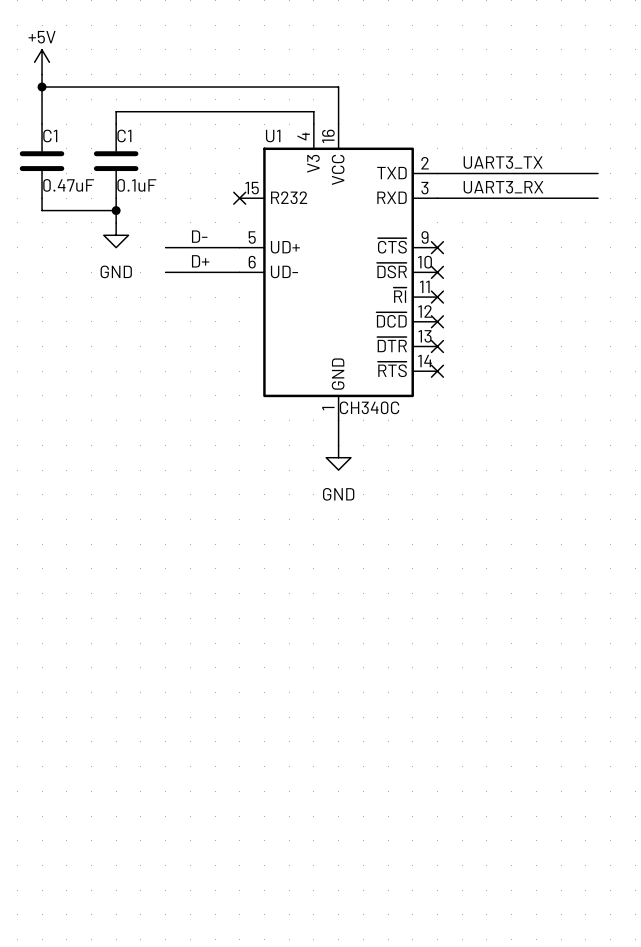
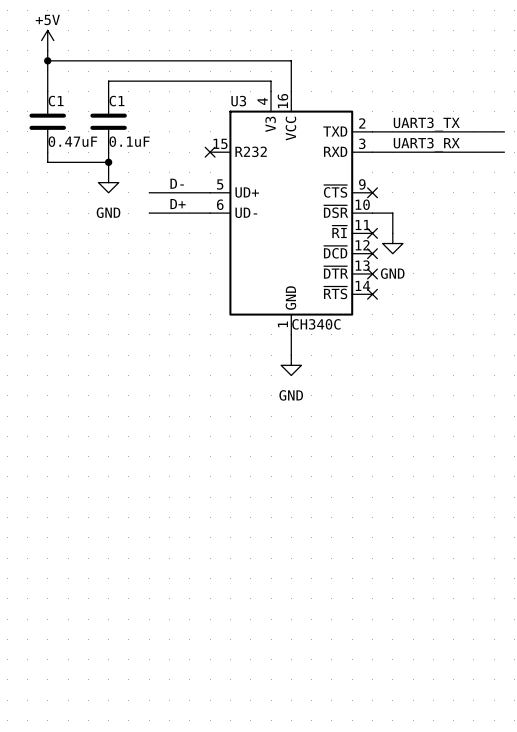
U1 name: U1 (273, 136) -> U3 (238, 101)
wire: none -> (372, 213) (392, 213) (392, 233)
no-connect mark: (437, 272) -> none
power symbol: none -> GND (392, 243)

